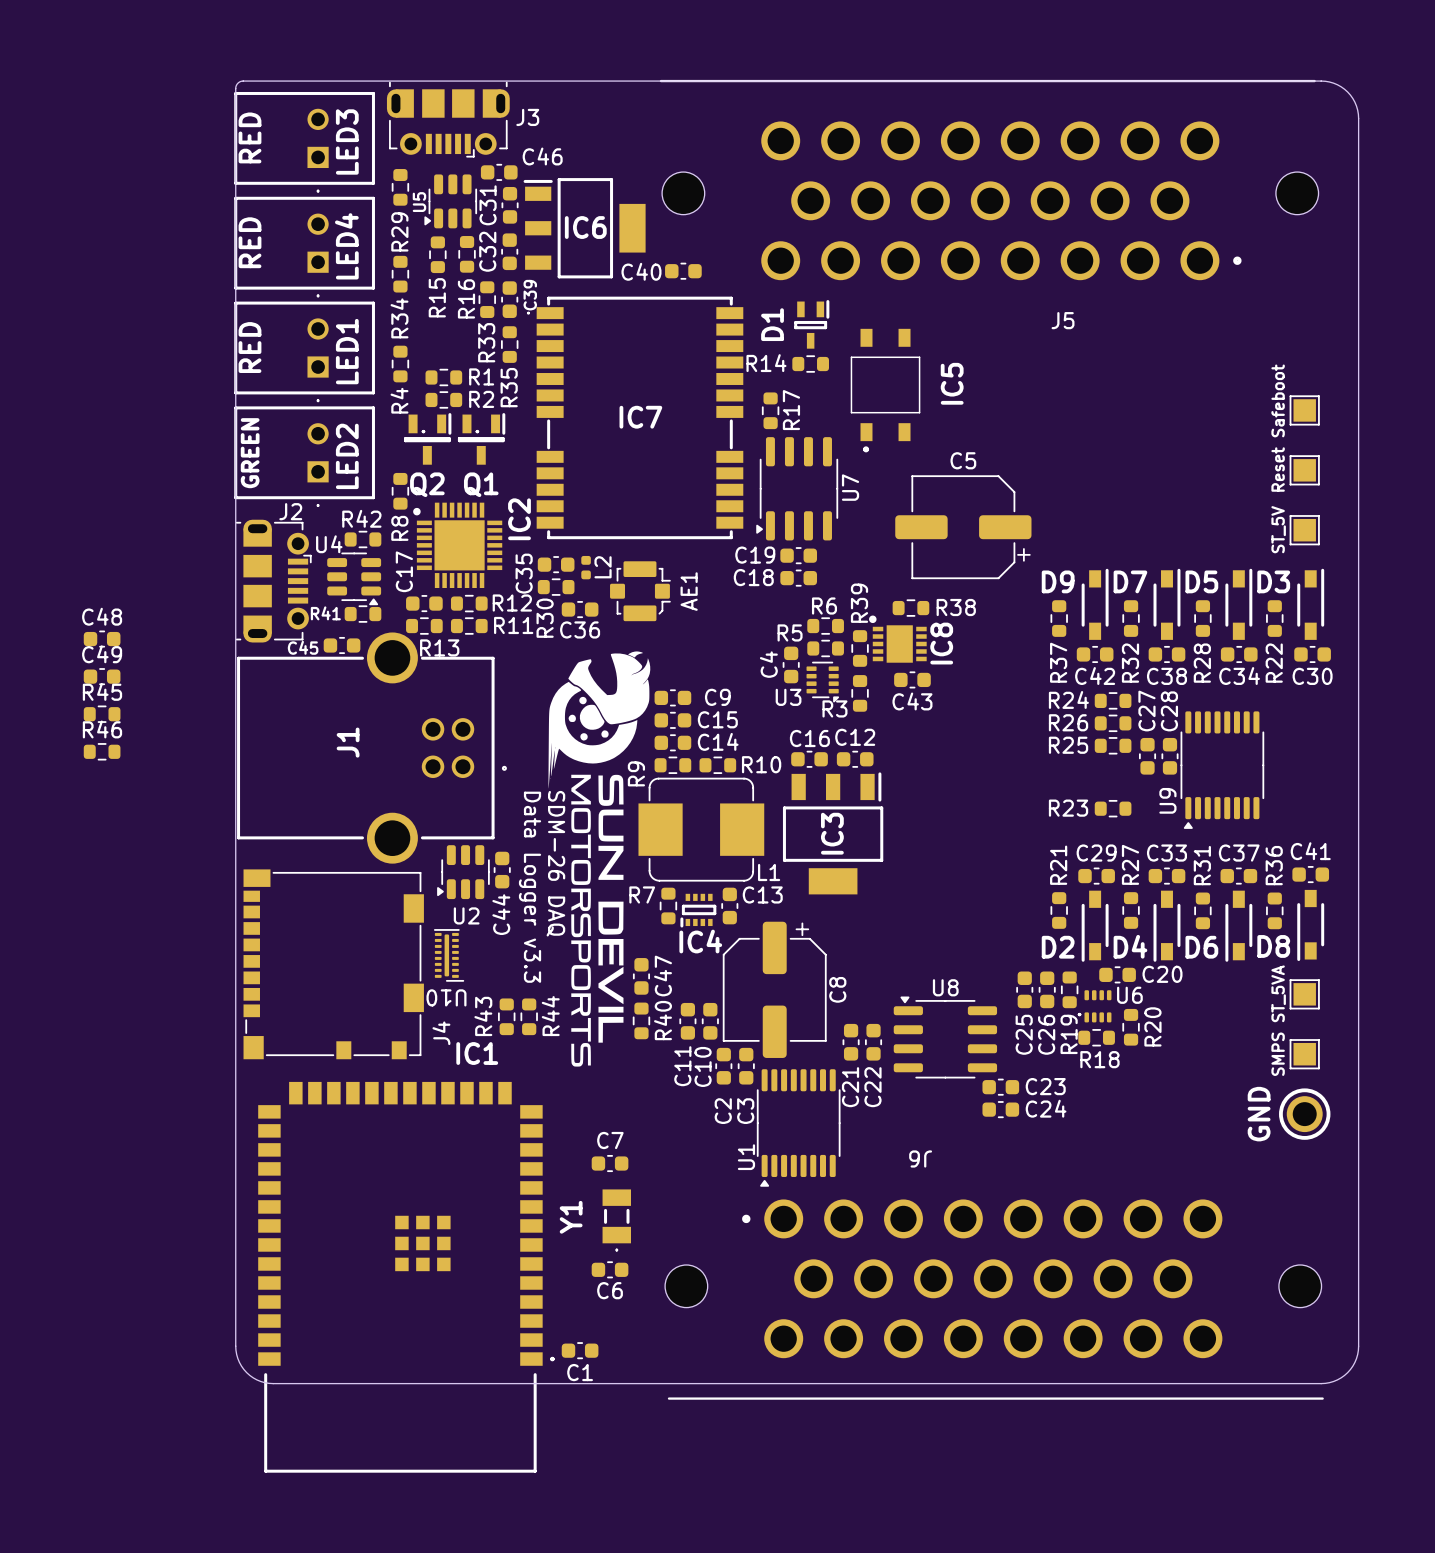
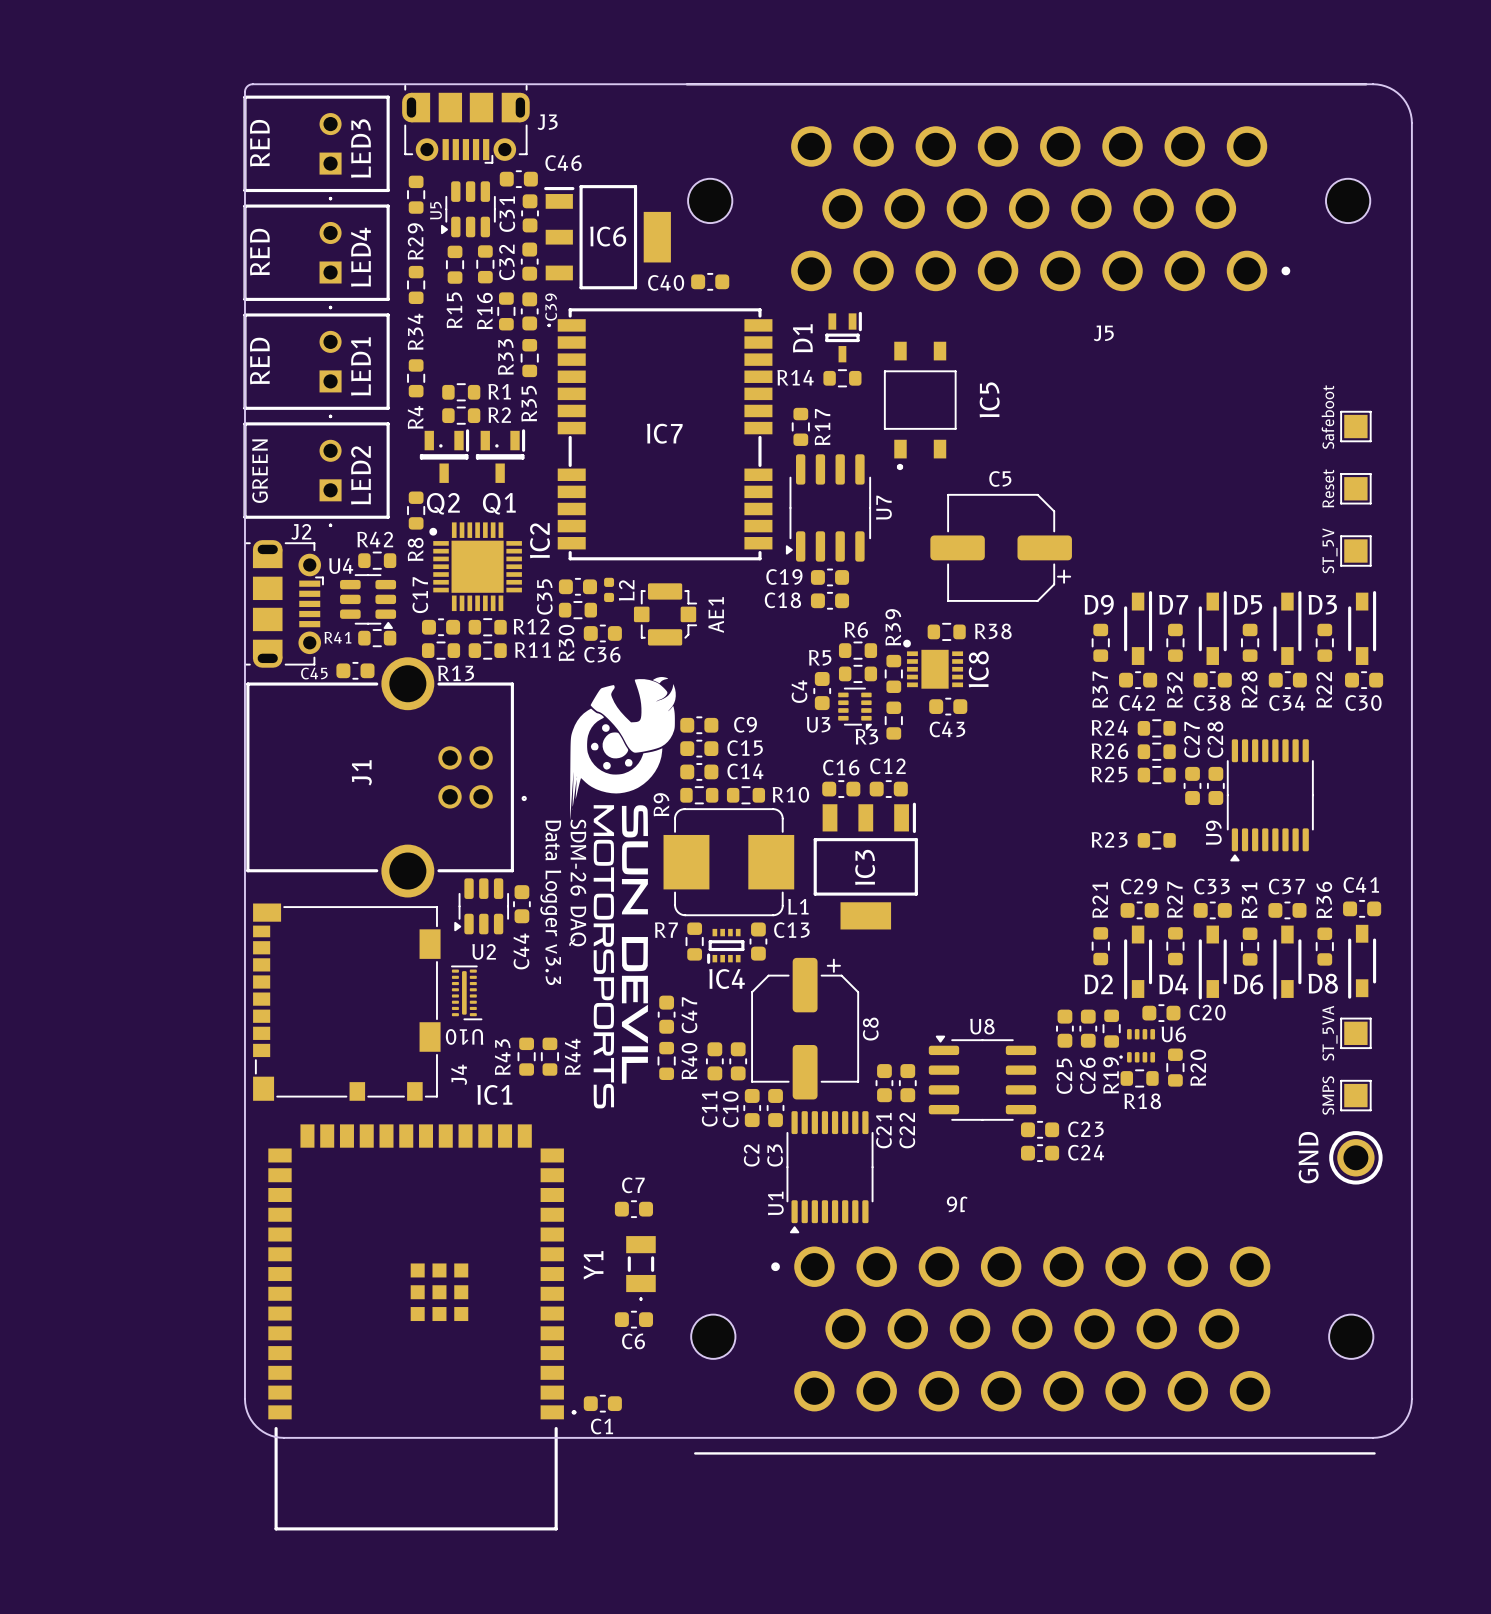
C48: (102, 639) -> none
C49: (102, 676) -> none
R45: (102, 714) -> none
R46: (102, 751) -> none

